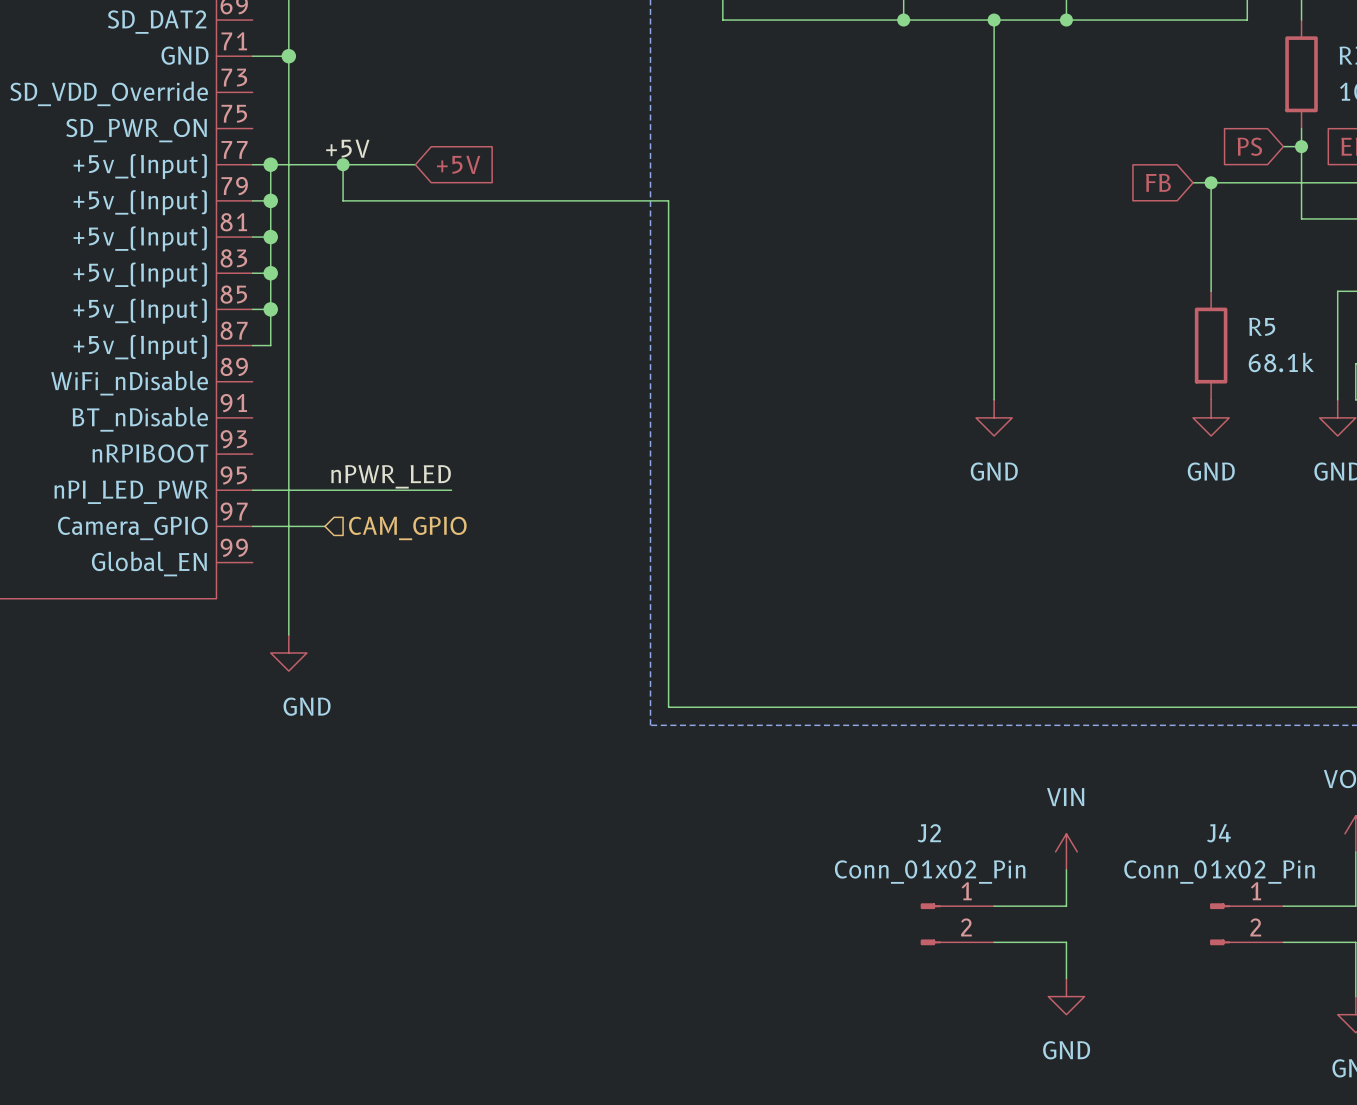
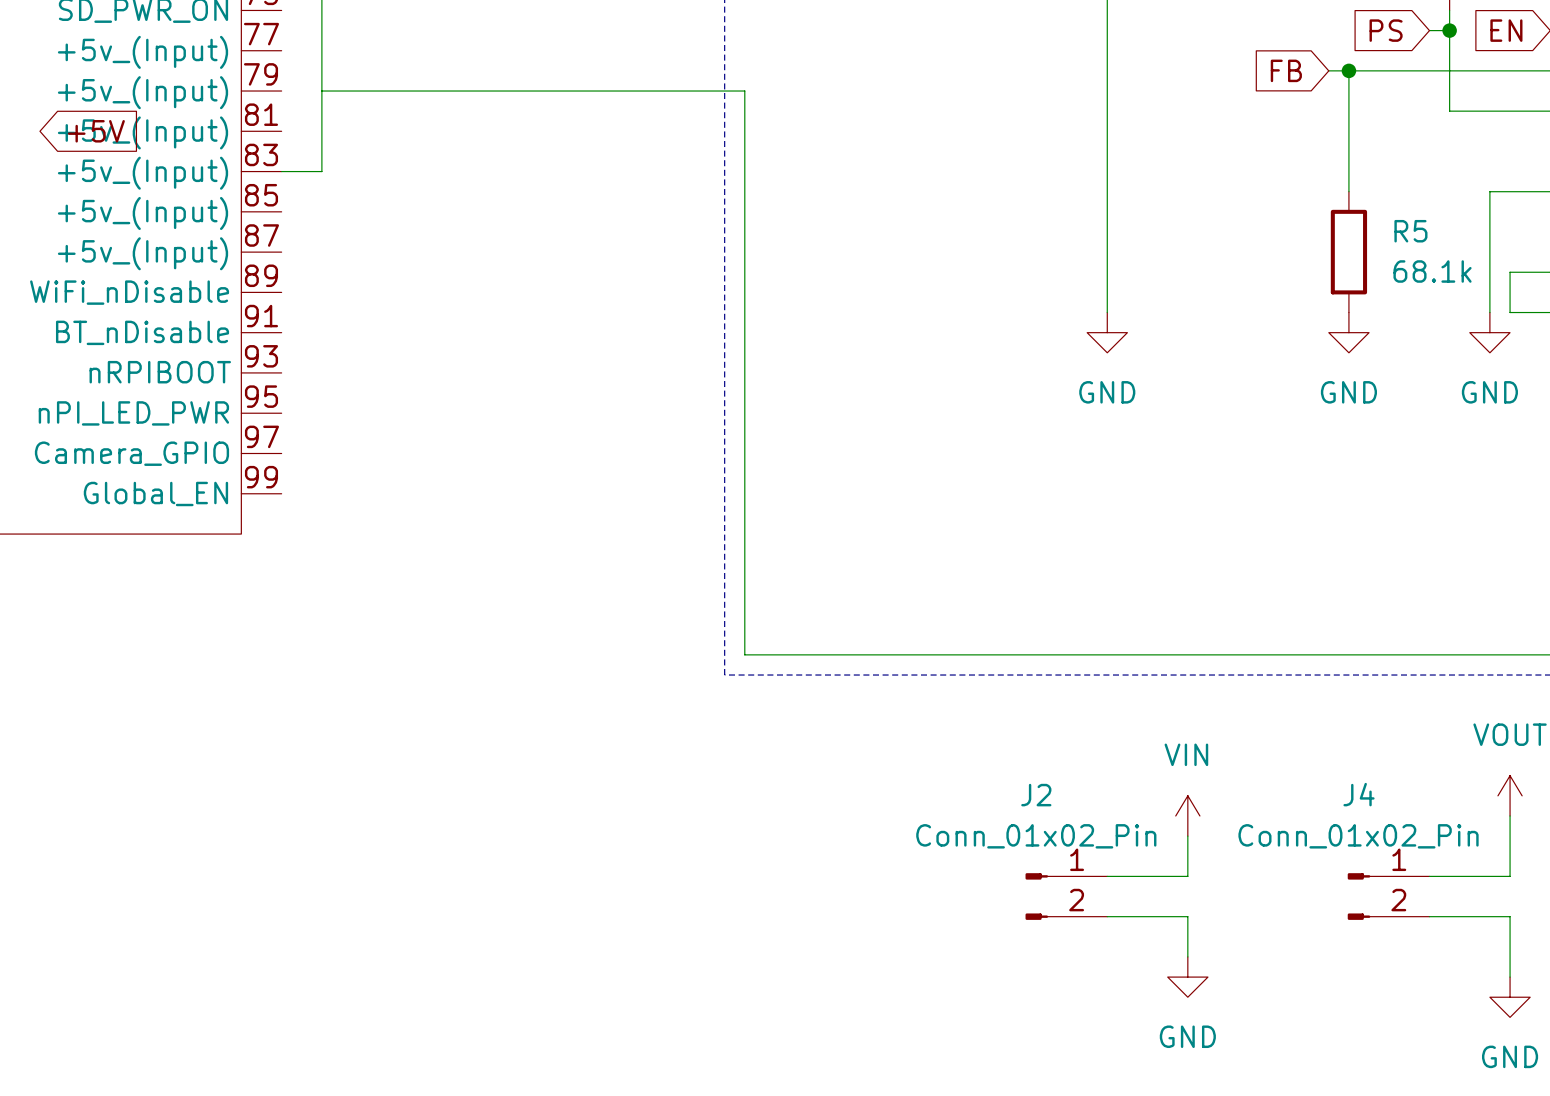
label: +5V (347, 148) -> none
wire: (252, 164) (415, 164) -> none
wire: (270, 164) (270, 345) (252, 345) -> none
junction: (270, 164) -> none
wire: (343, 164) (343, 200) -> (321, 91) (382, 91)
junction: (343, 164) -> none
global label: +5V (458, 164) -> none
wire: (252, 200) (270, 200) -> none
junction: (270, 200) -> none
global label: none -> +5V (96, 131)
wire: (252, 237) (270, 237) -> none
junction: (270, 237) -> none
junction: (270, 273) -> none
wire: (288, 273) (288, 634) -> (321, 171) (301, 171)
wire: (252, 309) (270, 309) -> none
junction: (270, 309) -> none
label: nPWR_LED (391, 476) -> none
wire: (252, 490) (451, 490) -> none
wire: (252, 526) (324, 526) -> none
hierarchical label: CAM_GPIO (407, 528) -> none
power symbol: GND (288, 652) -> none

